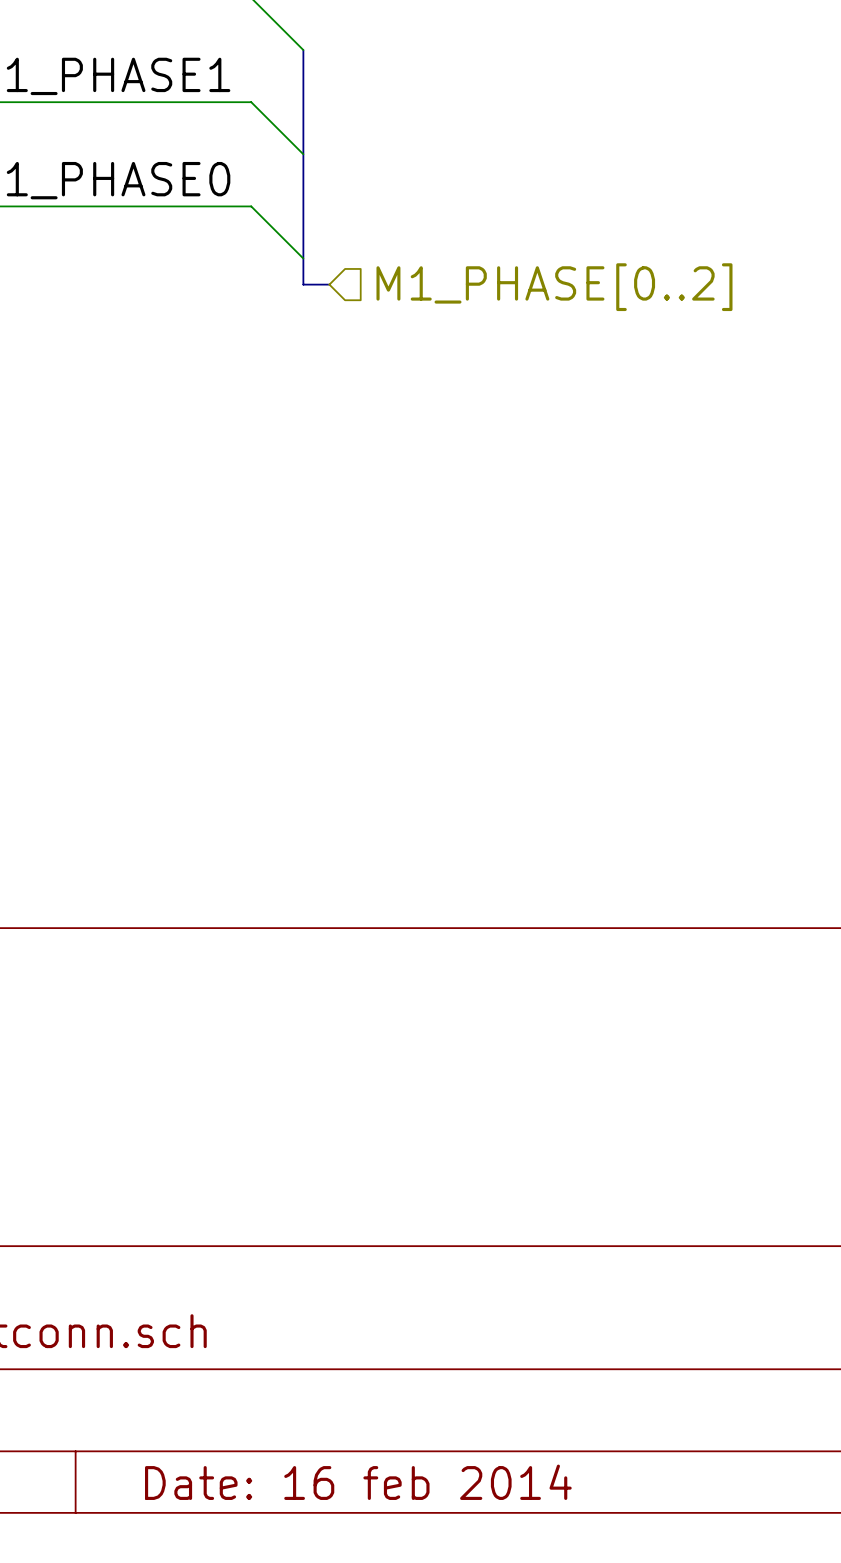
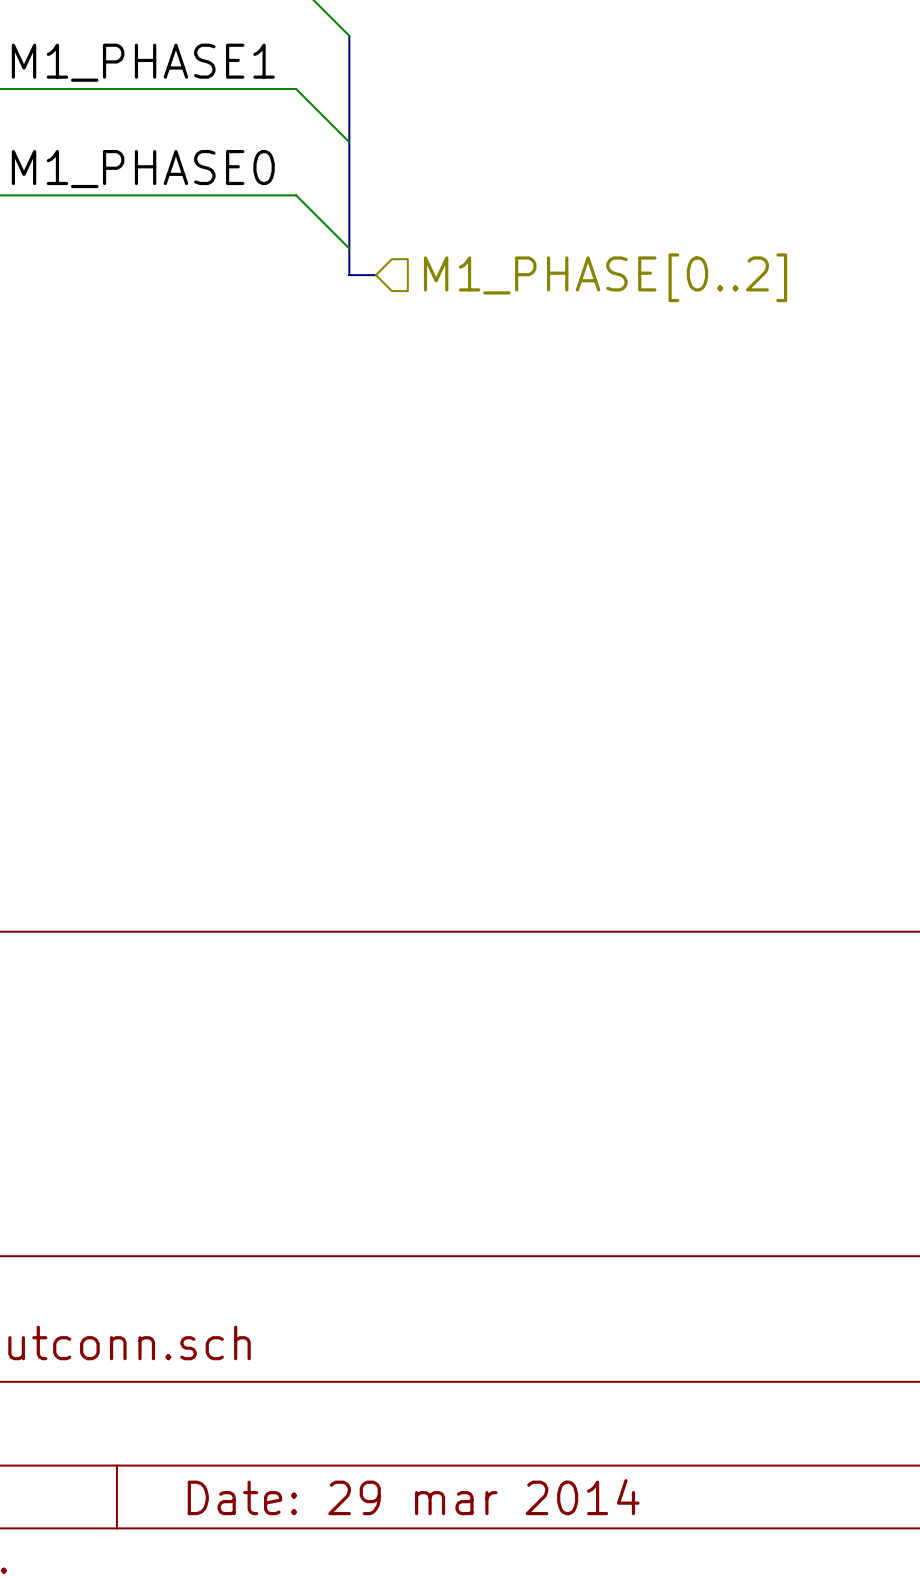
title block: Date: 16 feb 2014 (358, 1482) -> Date: 29 mar 2014 (413, 1497)

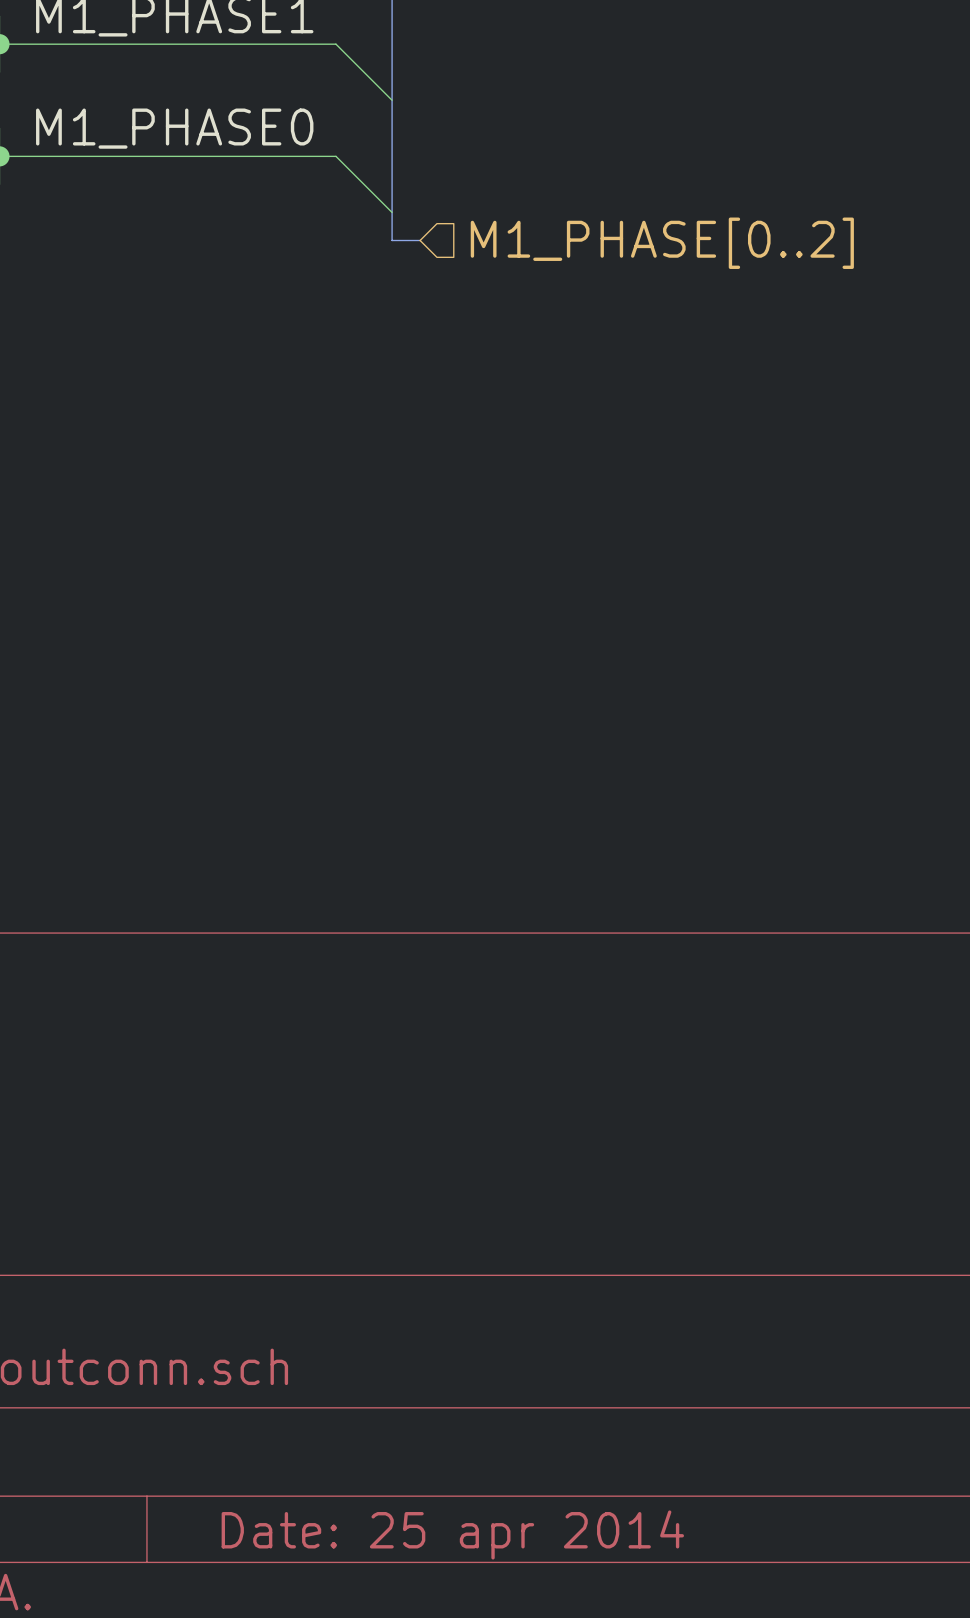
title block: Date: 29 mar 2014 (413, 1497) -> Date: 25 apr 2014 (452, 1534)

